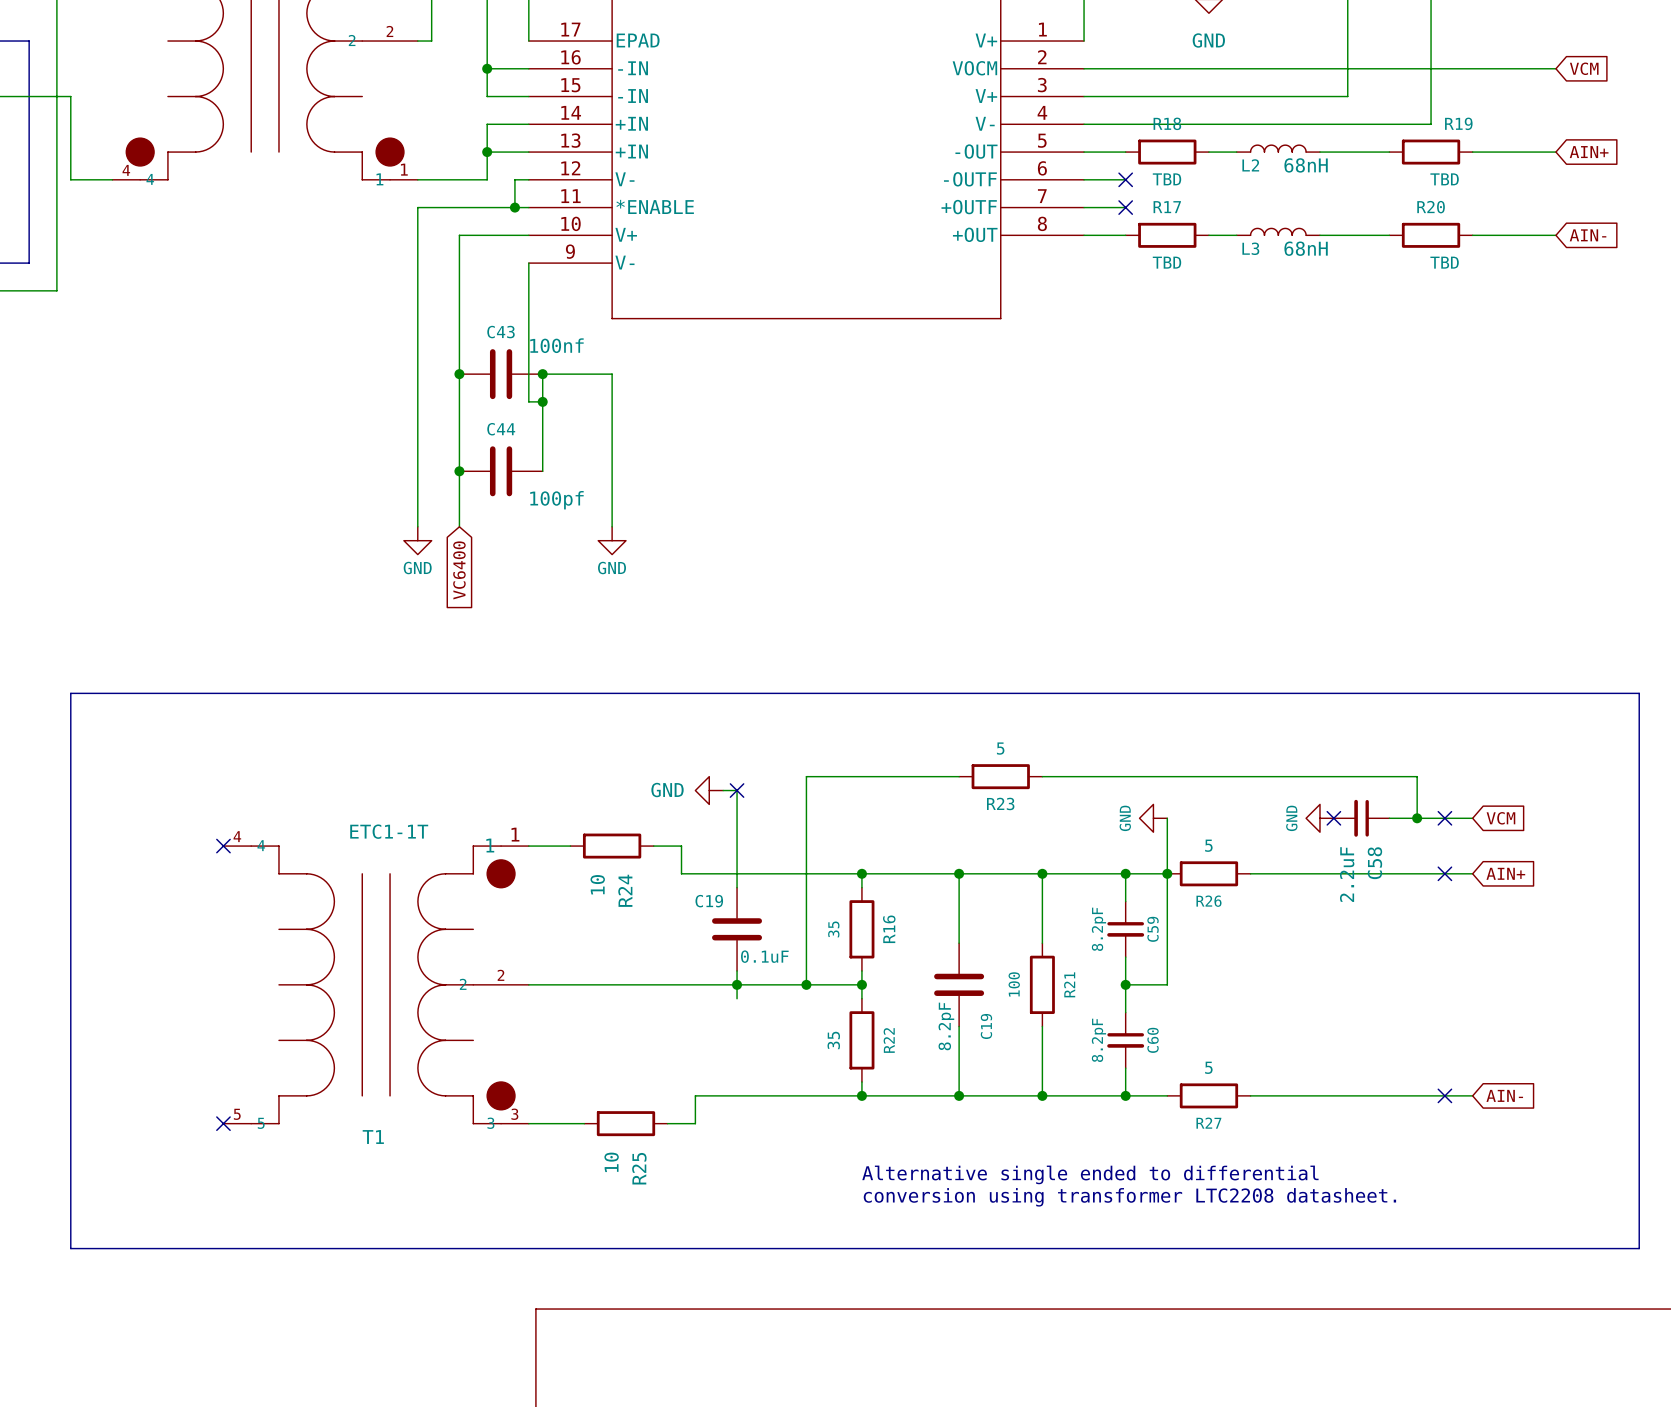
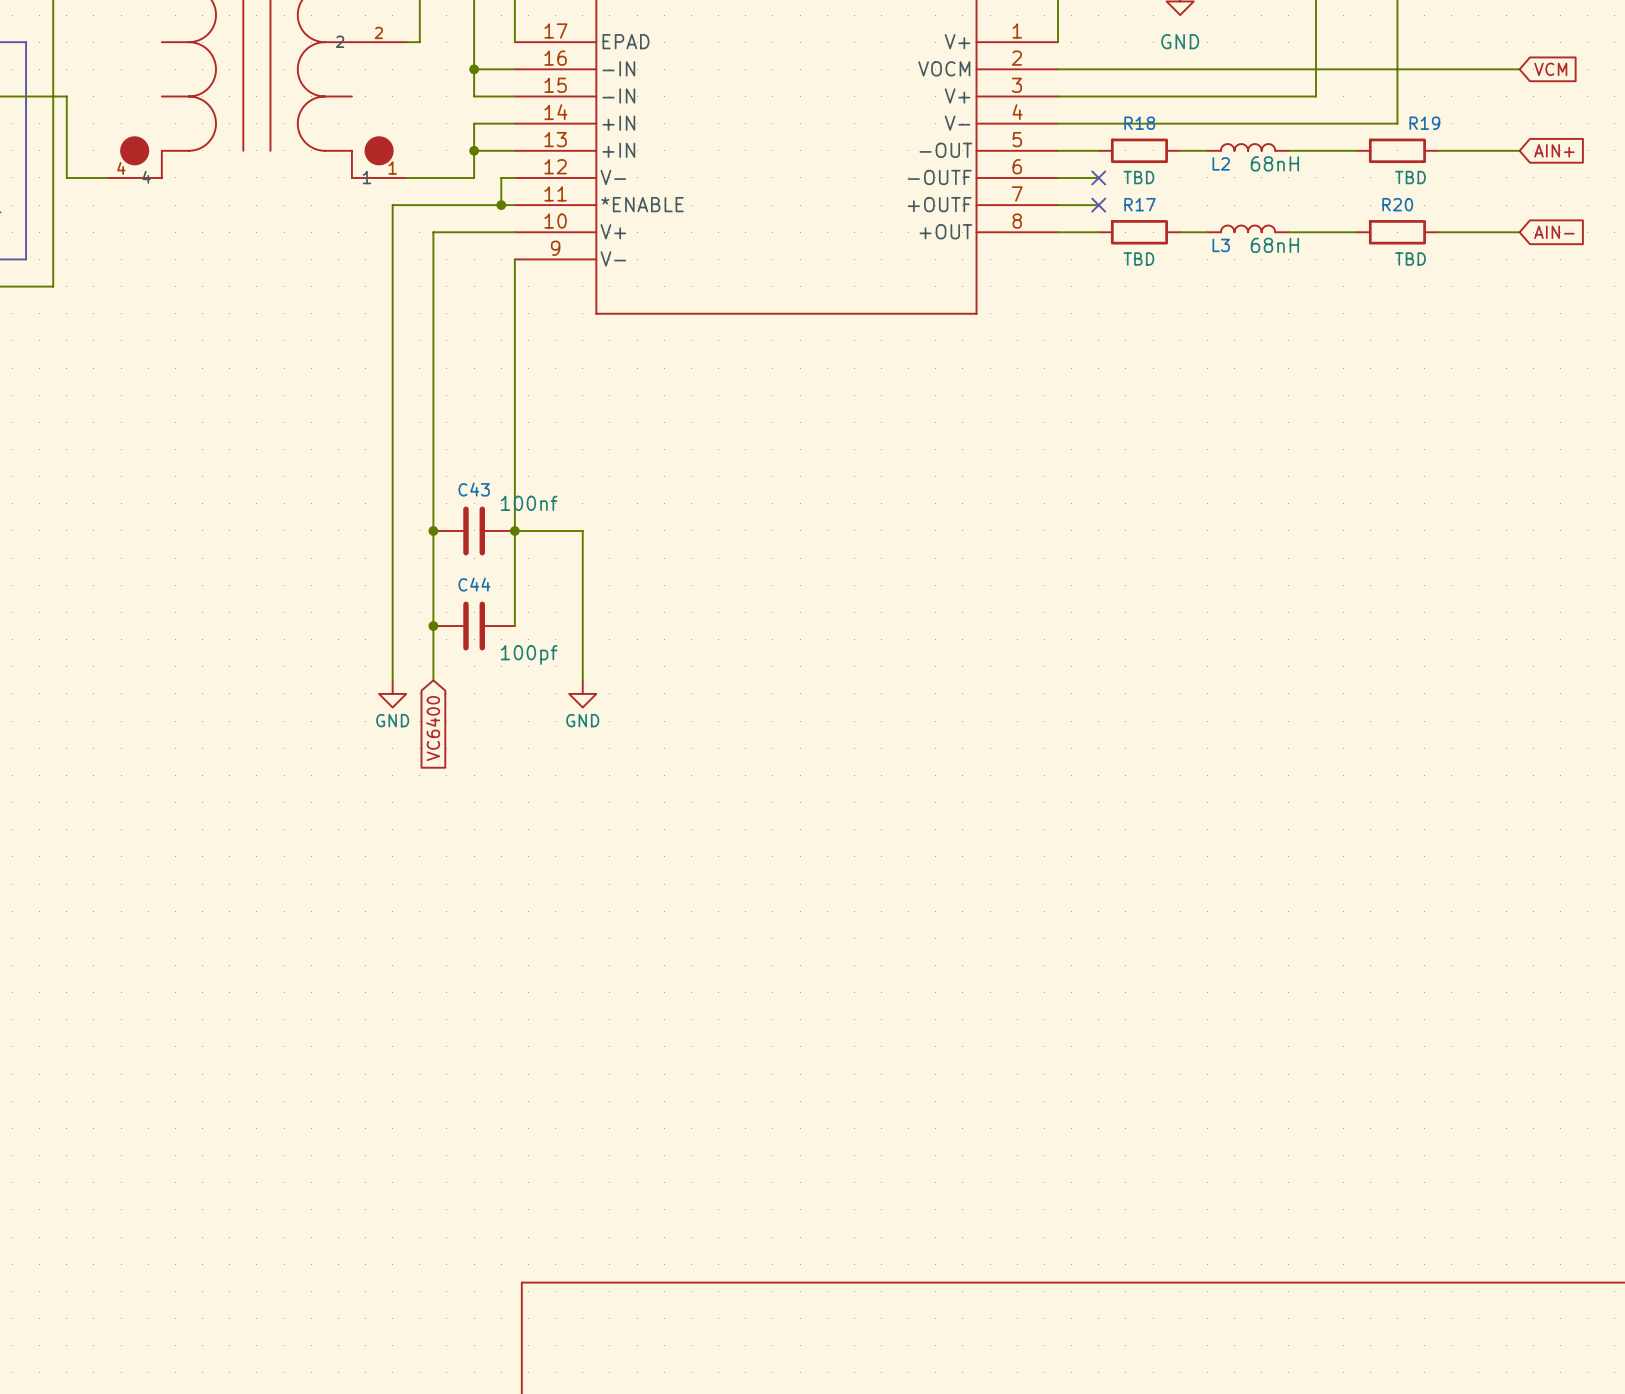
wire: (417, 207) (417, 526) -> (406, 205) (392, 205) (392, 680)
wire: (459, 235) (459, 526) -> (446, 232) (433, 232) (433, 680)
junction: (459, 374) -> none
C43 position: (501, 374) -> (474, 530)
junction: (542, 374) -> none
wire: (528, 401) (542, 401) -> (514, 395) (514, 626)
junction: (542, 401) -> none
junction: (459, 471) -> none
C44 position: (501, 471) -> (474, 626)
wire: (542, 471) (542, 374) (612, 374) (612, 526) -> none
power symbol: GND (417, 540) -> none
junction: none -> (433, 530)
wire: none -> (514, 530) (582, 530) (582, 680)
junction: none -> (514, 530)
power symbol: GND (612, 540) -> none
global label position: VC6400 (459, 570) -> VC6400 (433, 728)
junction: none -> (433, 626)
line: (70, 693) (1639, 693) (1639, 1248) (70, 1248) (70, 693) -> none
power symbol: none -> GND (392, 693)
power symbol: none -> GND (582, 693)
wire: (959, 776) (806, 776) (806, 984) -> none
R23: 5 (1000, 776) -> none
wire: (1042, 776) (1417, 776) (1417, 818) -> none
power symbol: GND (709, 790) -> none
wire: (723, 790) (737, 790) (737, 887) -> none
no-connect mark: (737, 790) -> none
power symbol: GND (1153, 818) -> none
wire: (1167, 818) (1167, 984) (1125, 984) -> none
power symbol: GND (1319, 818) -> none
no-connect mark: (1333, 818) -> none
C58: 2.2uF (1361, 818) -> none
wire: (1389, 818) (1472, 818) -> none
junction: (1417, 818) -> none
no-connect mark: (1444, 818) -> none
global label: VCM (1500, 818) -> none
no-connect mark: (223, 846) -> none
wire: (528, 846) (570, 846) -> none
R24: 10 (612, 846) -> none
wire: (653, 846) (681, 846) (681, 873) (1167, 873) -> none
wire: (861, 873) (861, 887) -> none
junction: (861, 873) -> none
wire: (959, 873) (959, 943) -> none
junction: (959, 873) -> none
wire: (1042, 873) (1042, 943) -> none
junction: (1042, 873) -> none
wire: (1125, 873) (1125, 901) -> none
junction: (1125, 873) -> none
junction: (1167, 873) -> none
R26: 5 (1208, 873) -> none
wire: (1250, 873) (1472, 873) -> none
no-connect mark: (1444, 873) -> none
global label: AIN+ (1505, 873) -> none
C19: 0.1uF (737, 929) -> none
R16: 35 (861, 929) -> none
C59: 8.2pF (1125, 929) -> none
wire: (1125, 957) (1125, 1012) -> none
wire: (737, 970) (737, 998) -> none
wire: (861, 970) (861, 998) -> none
T1: ETC1-1T (376, 984) -> none
wire: (528, 984) (861, 984) -> none
junction: (737, 984) -> none
junction: (806, 984) -> none
junction: (861, 984) -> none
C19: 8.2pF (959, 984) -> none
R21: 100 (1042, 984) -> none
junction: (1125, 984) -> none
wire: (959, 1026) (959, 1095) -> none
wire: (1042, 1026) (1042, 1095) -> none
R22: 35 (861, 1040) -> none
C60: 8.2pF (1125, 1040) -> none
wire: (1125, 1068) (1125, 1095) -> none
wire: (861, 1082) (861, 1095) -> none
junction: (861, 1095) -> none
junction: (959, 1095) -> none
junction: (1042, 1095) -> none
junction: (1125, 1095) -> none
wire: (1167, 1095) (695, 1095) (695, 1123) (667, 1123) -> none
R27: 5 (1208, 1095) -> none
wire: (1250, 1095) (1472, 1095) -> none
no-connect mark: (1444, 1095) -> none
global label: AIN- (1504, 1095) -> none
no-connect mark: (223, 1123) -> none
wire: (528, 1123) (584, 1123) -> none
R25: 10 (625, 1123) -> none
text: Alternative single ended to differential (1090, 1174) -> none
text: conversion using transformer LTC2208 datasheet. (1129, 1197) -> none

